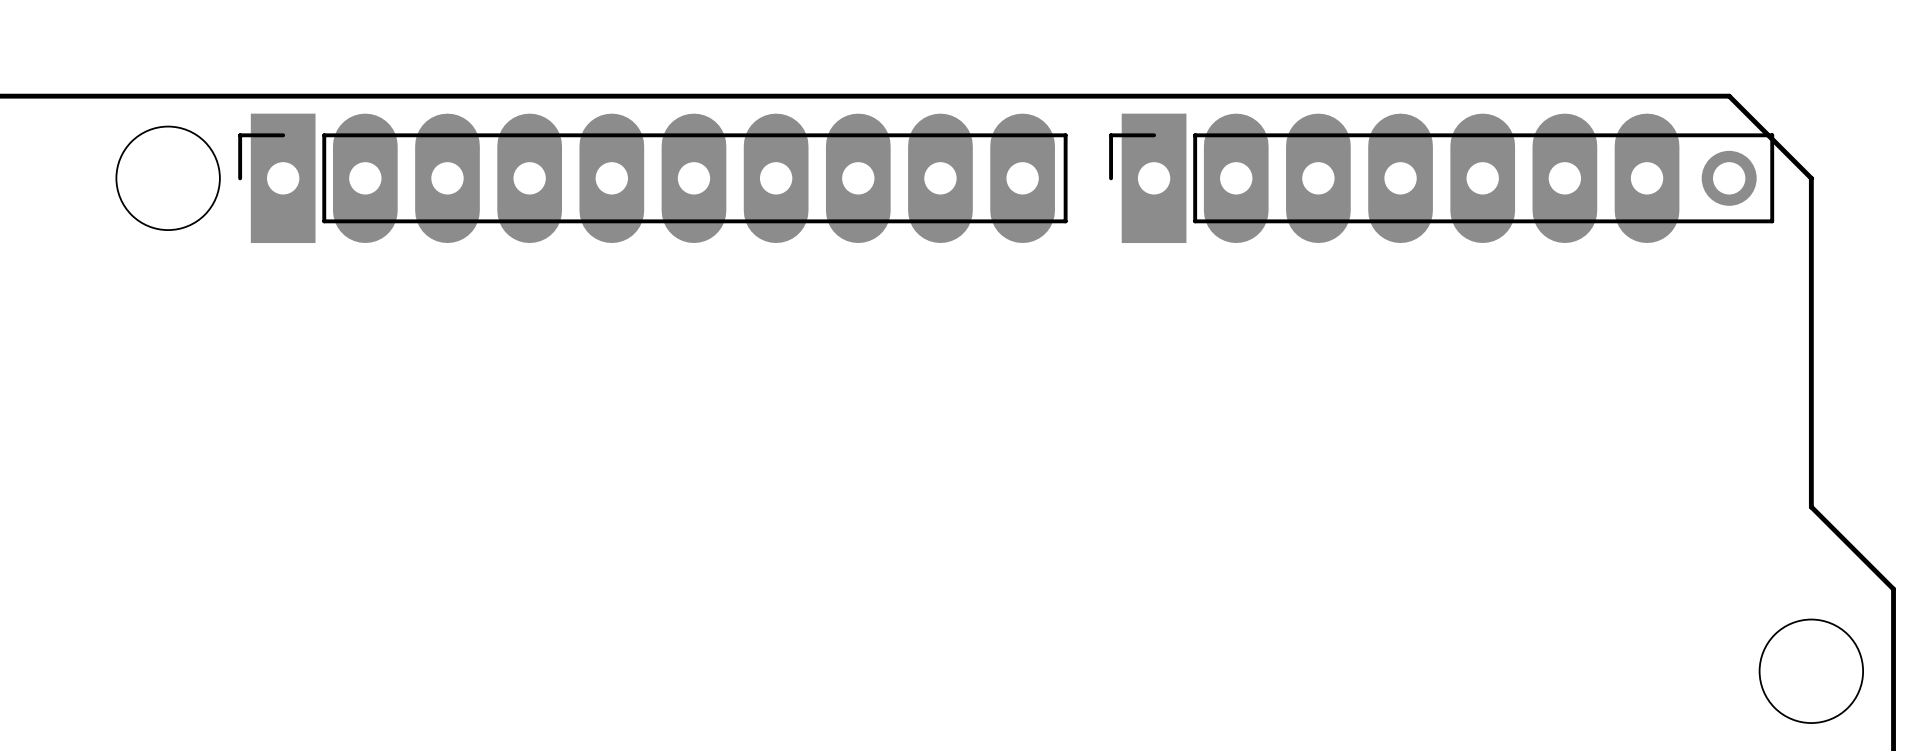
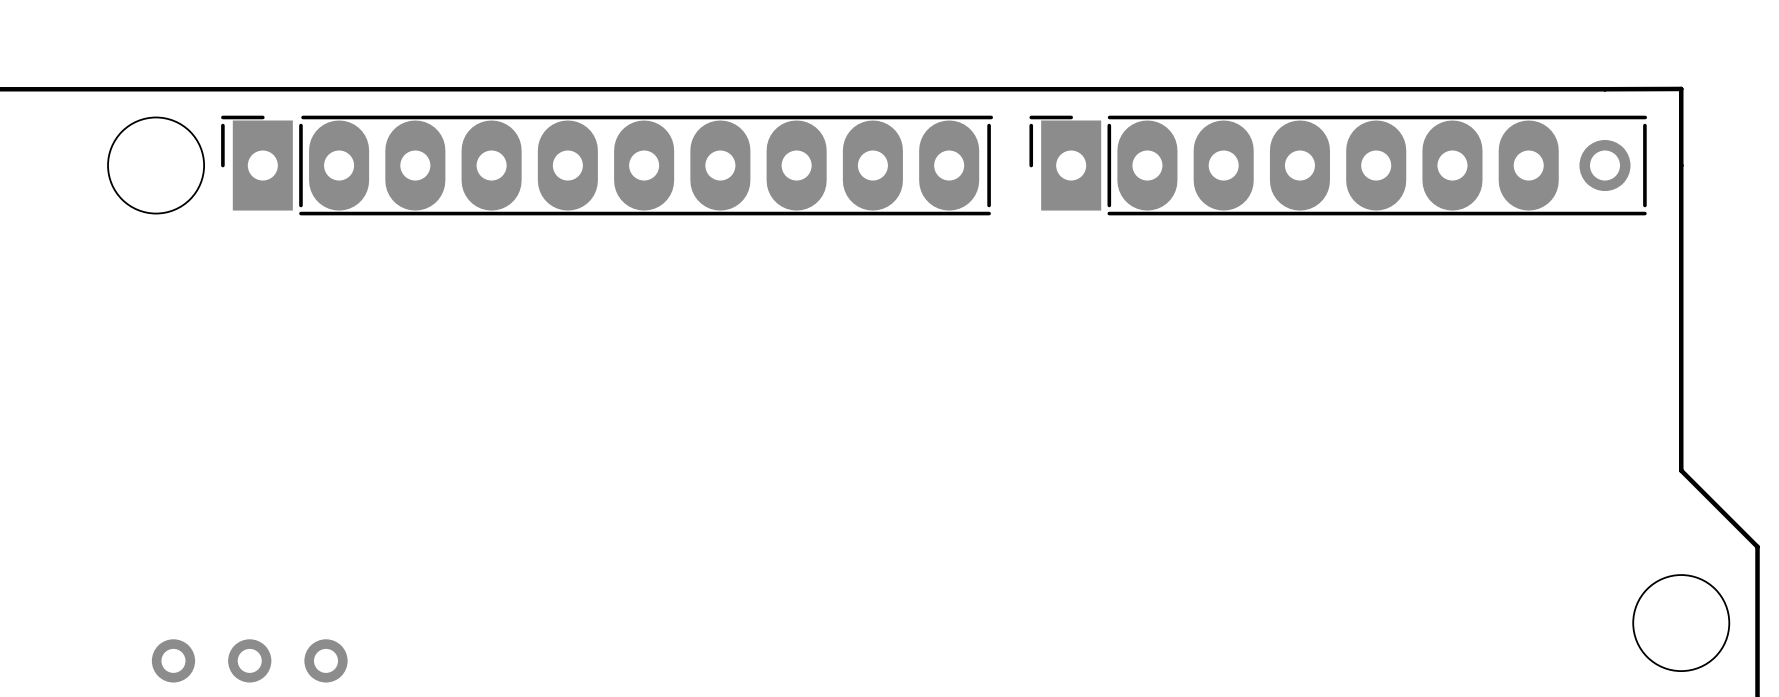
board edge: (1729, 96) (1811, 178) -> (1604, 89) (1681, 88) (1681, 165)
part footprint: [238, 113, 1068, 244] -> [221, 115, 993, 216]
part footprint: [1109, 113, 1775, 244] -> [1029, 115, 1648, 216]
part: none -> (249, 660)

